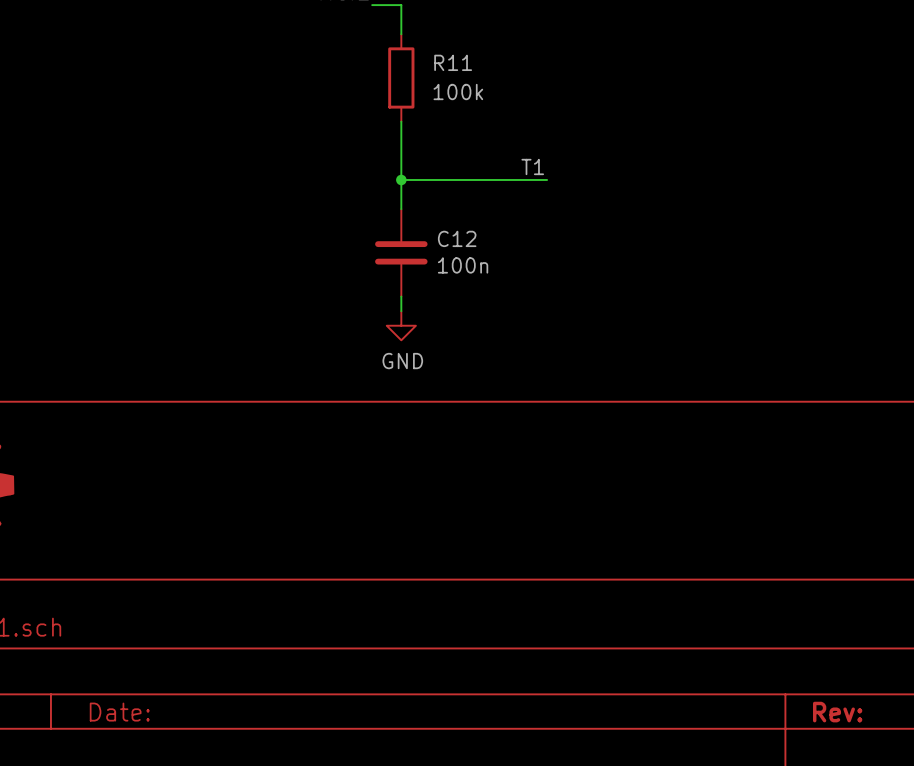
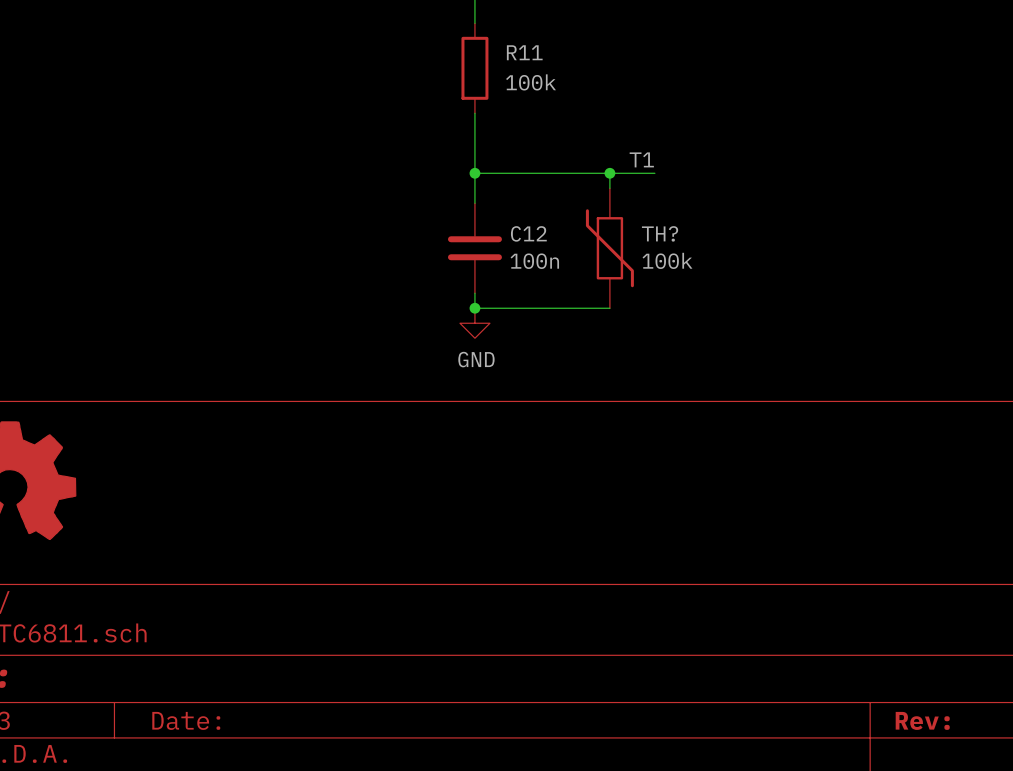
label position: T1 (532, 166) -> T1 (641, 159)
wire: none -> (609, 173) (609, 188)
junction: none -> (609, 173)
wire: none -> (624, 173) (654, 173)
TH?: none -> 100k (609, 248)
wire: none -> (474, 308) (609, 308)
junction: none -> (474, 308)

